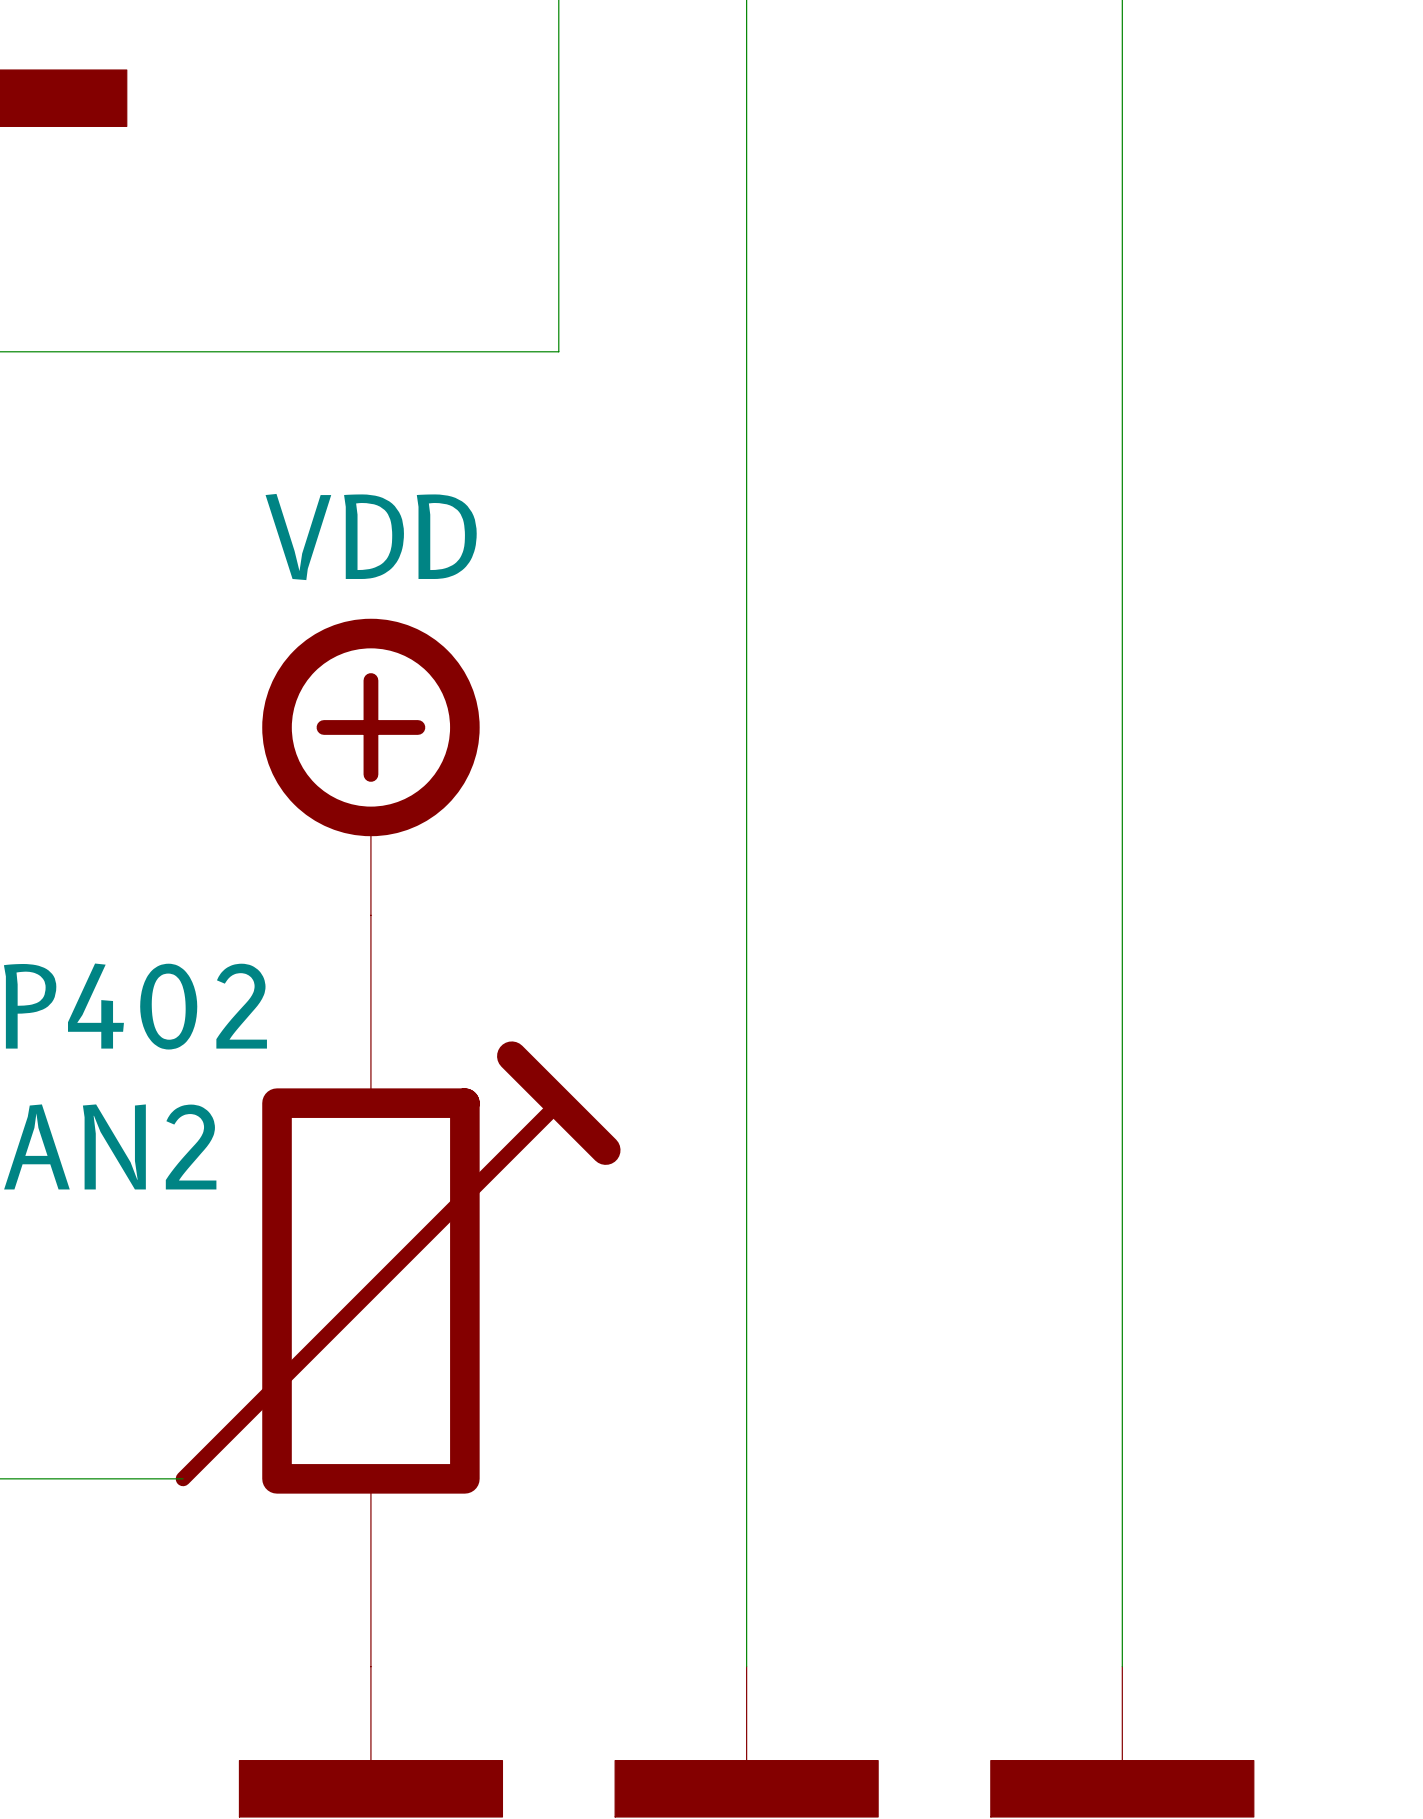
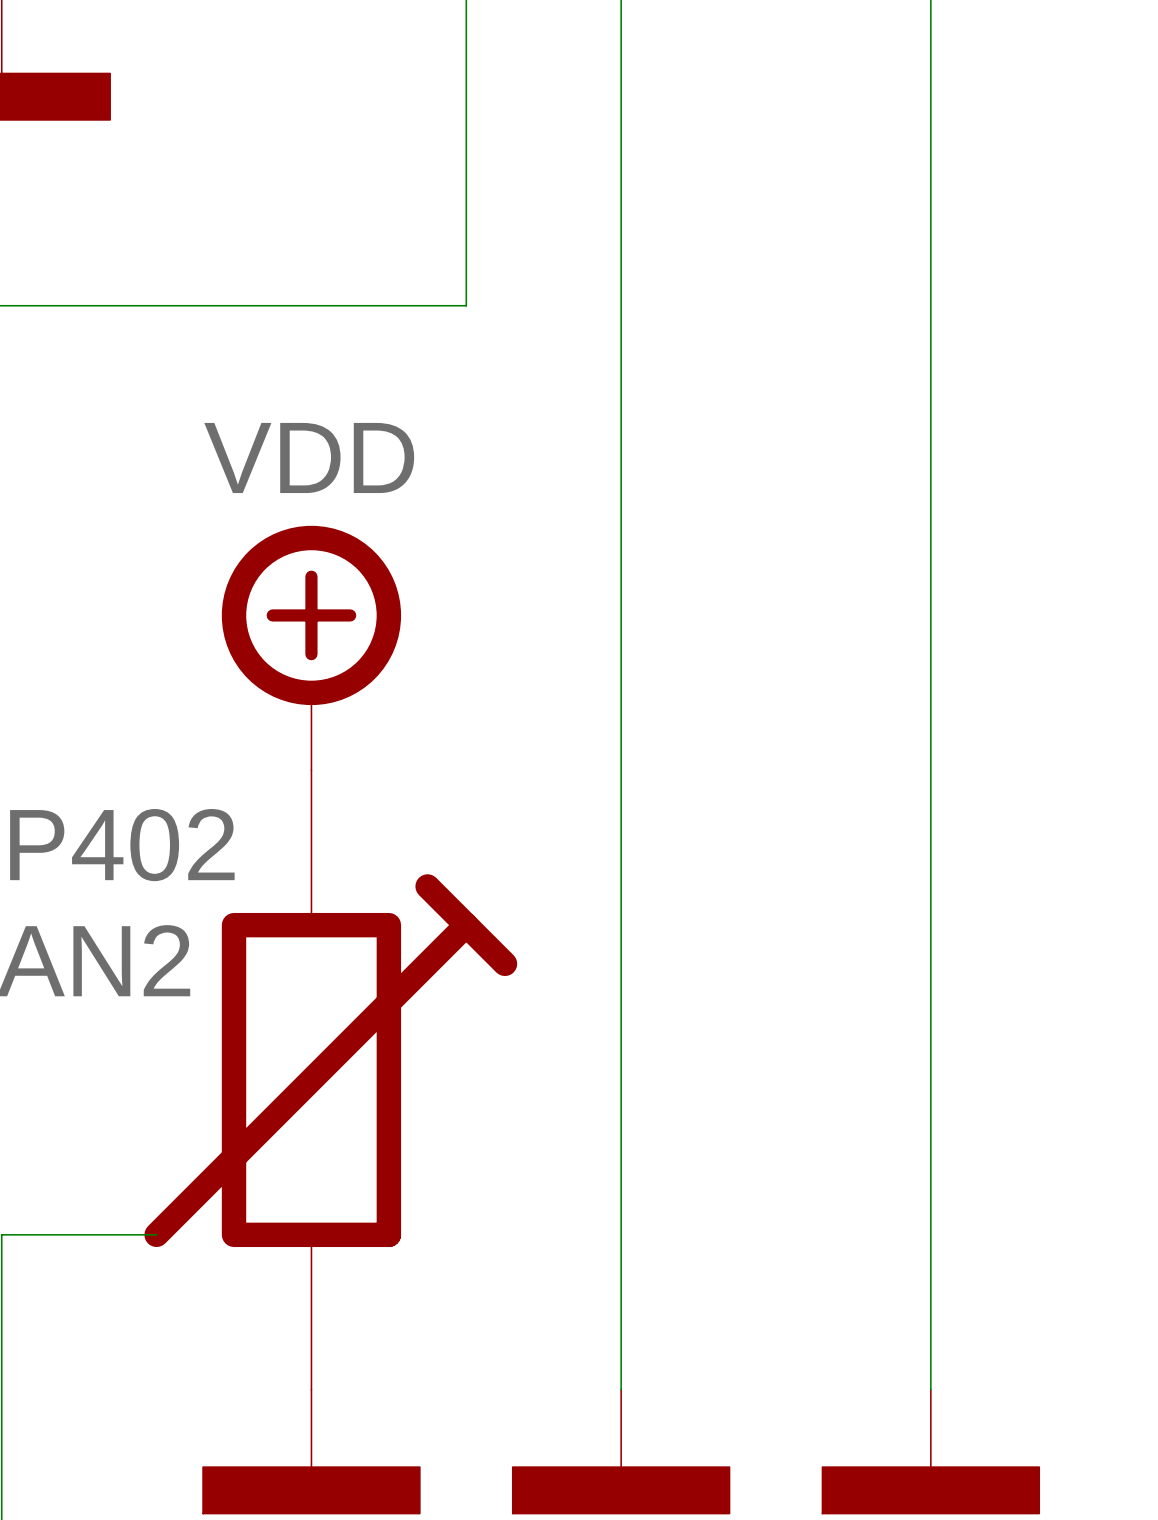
P402 symbol: [175, 915, 621, 1667] -> [144, 770, 518, 1390]

